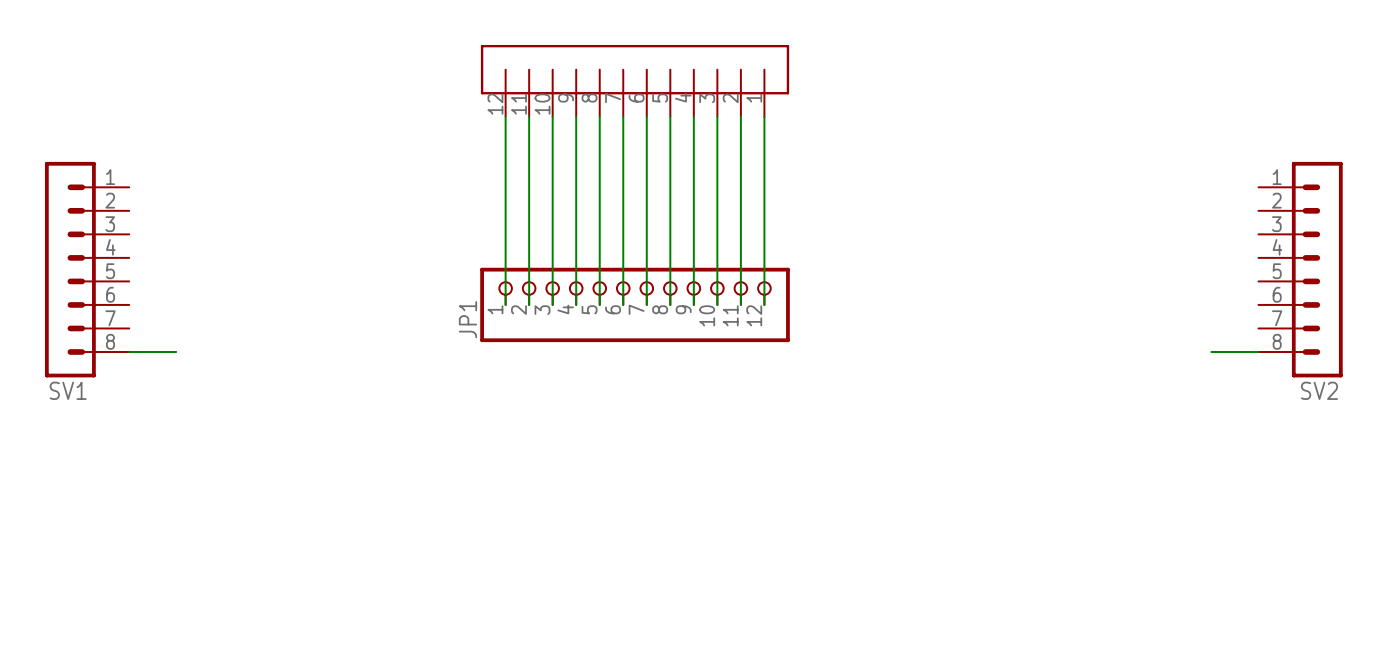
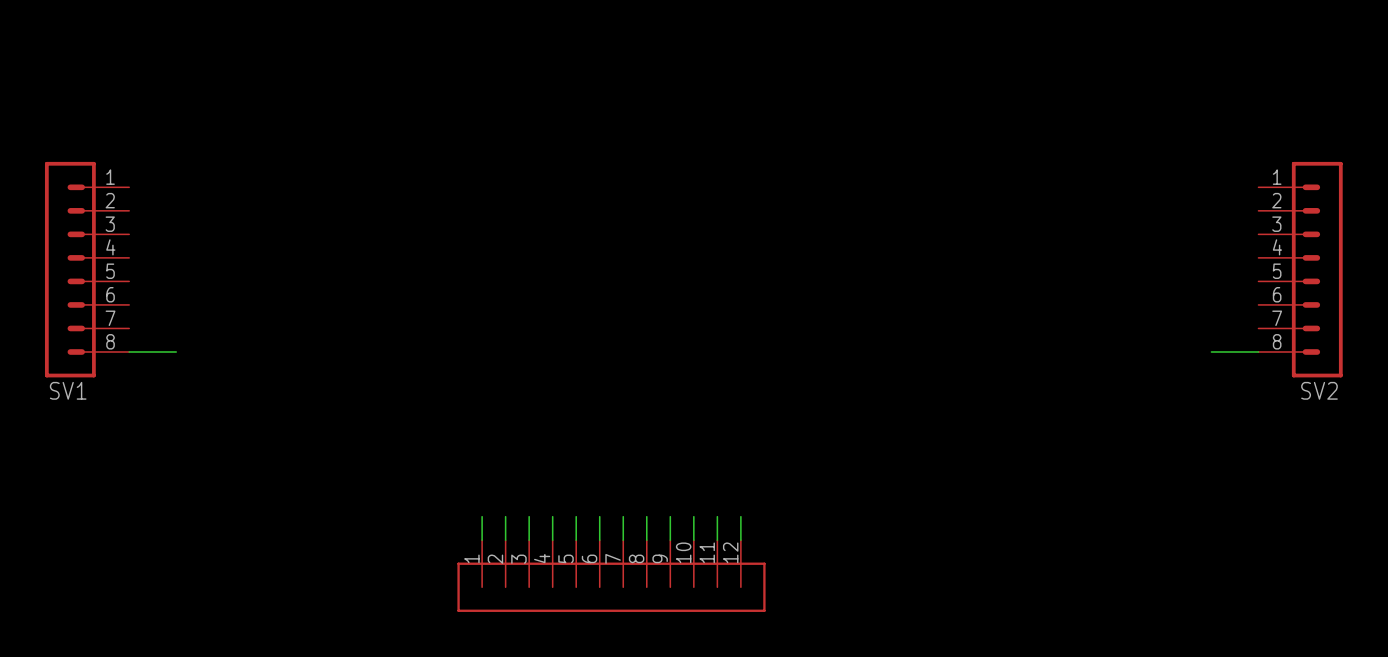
part: (635, 80) -> none
wire: (505, 116) (505, 304) -> none
wire: (529, 116) (529, 304) -> none
wire: (552, 116) (552, 304) -> none
wire: (576, 116) (576, 304) -> none
wire: (599, 116) (599, 304) -> none
wire: (623, 116) (623, 304) -> none
wire: (646, 116) (646, 304) -> none
wire: (670, 116) (670, 304) -> none
wire: (693, 116) (693, 304) -> none
wire: (717, 116) (717, 304) -> none
wire: (740, 116) (740, 304) -> none
wire: (764, 116) (764, 304) -> none
JP1: (635, 304) -> none
wire: none -> (482, 516) (482, 540)
wire: none -> (505, 516) (505, 540)
wire: none -> (529, 516) (529, 540)
wire: none -> (552, 516) (552, 540)
wire: none -> (576, 516) (576, 540)
wire: none -> (599, 516) (599, 540)
wire: none -> (623, 516) (623, 540)
wire: none -> (646, 516) (646, 540)
wire: none -> (670, 516) (670, 540)
wire: none -> (693, 516) (693, 540)
wire: none -> (717, 516) (717, 540)
wire: none -> (740, 516) (740, 540)
part: none -> (611, 576)

